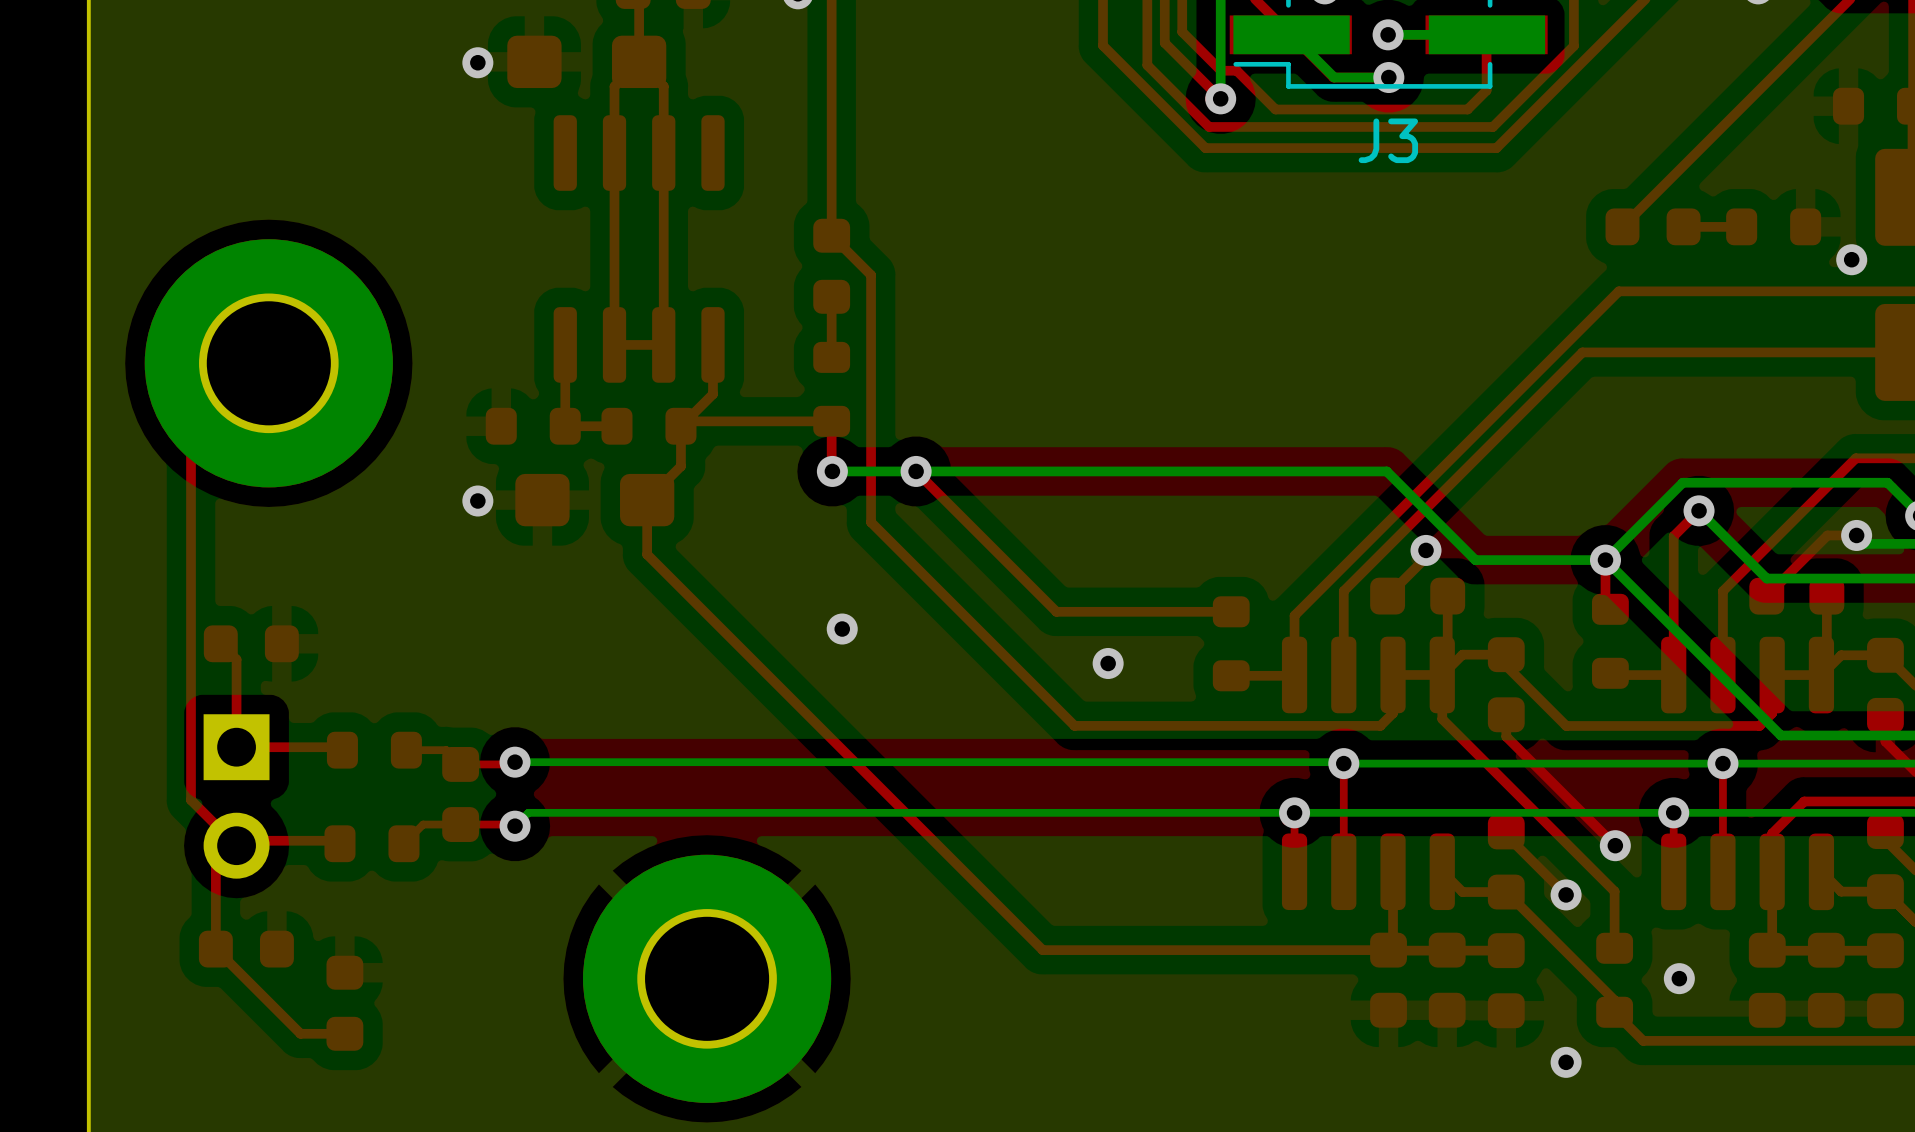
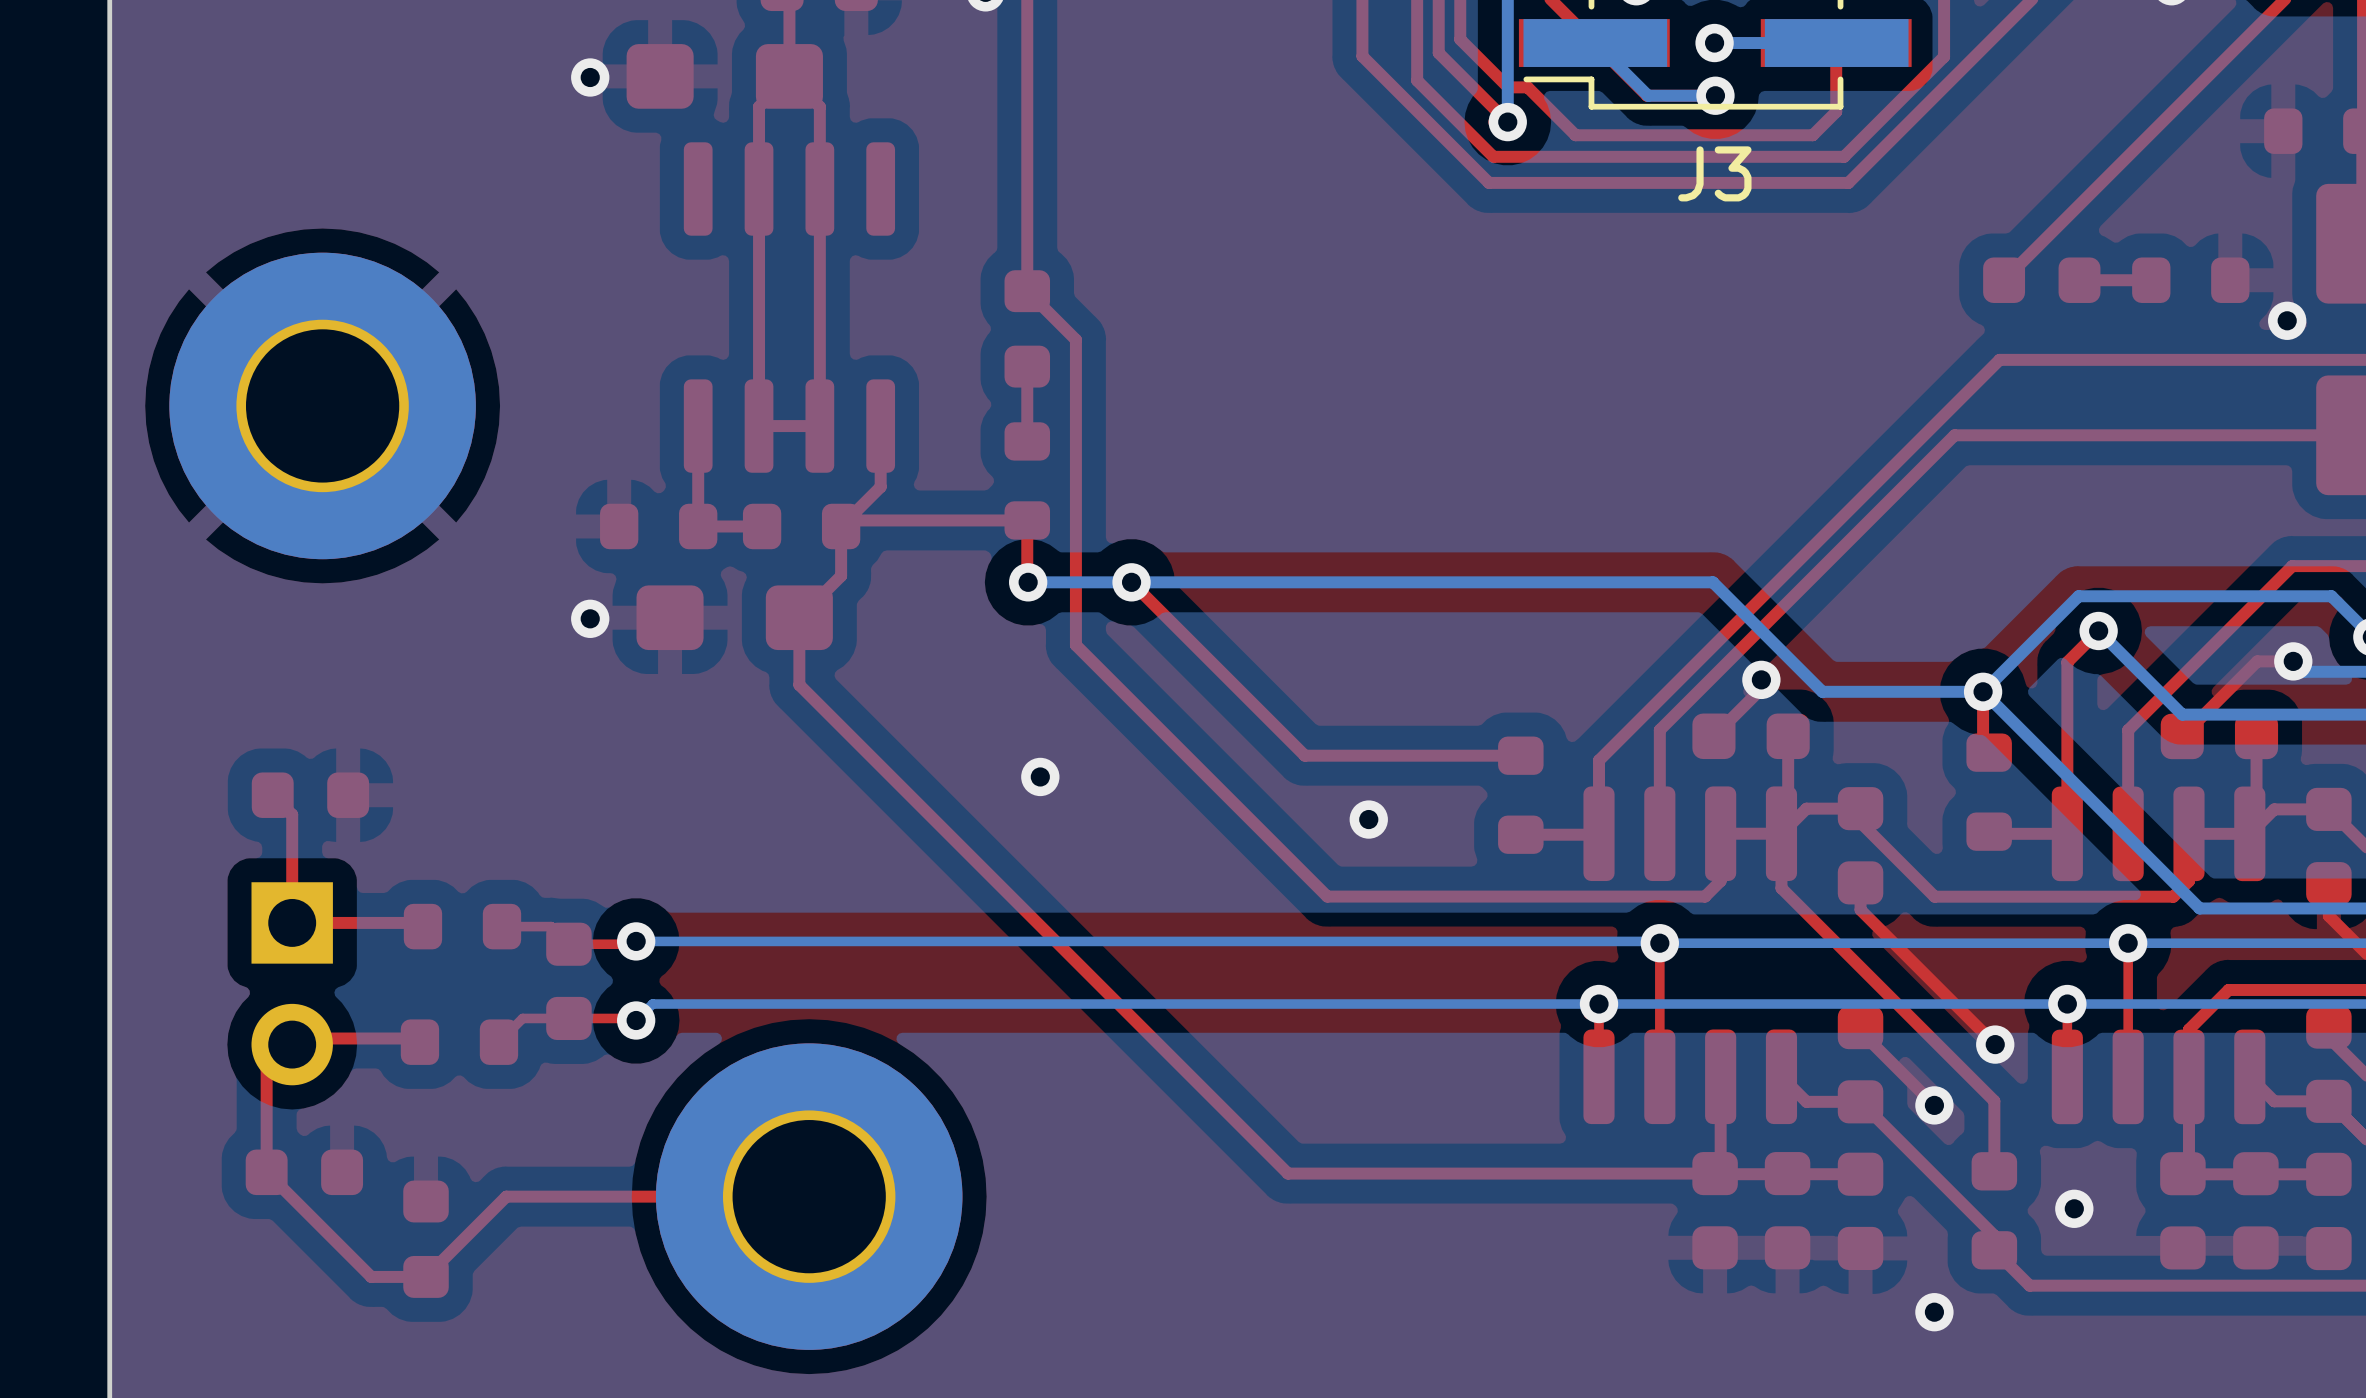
top track: (268, 363) (191, 441) (191, 800) (236, 845) -> none
part position: (268, 363) -> (322, 405)
top track: none -> (809, 1196) (506, 1196) (426, 1276)
part position: (707, 978) -> (809, 1196)

